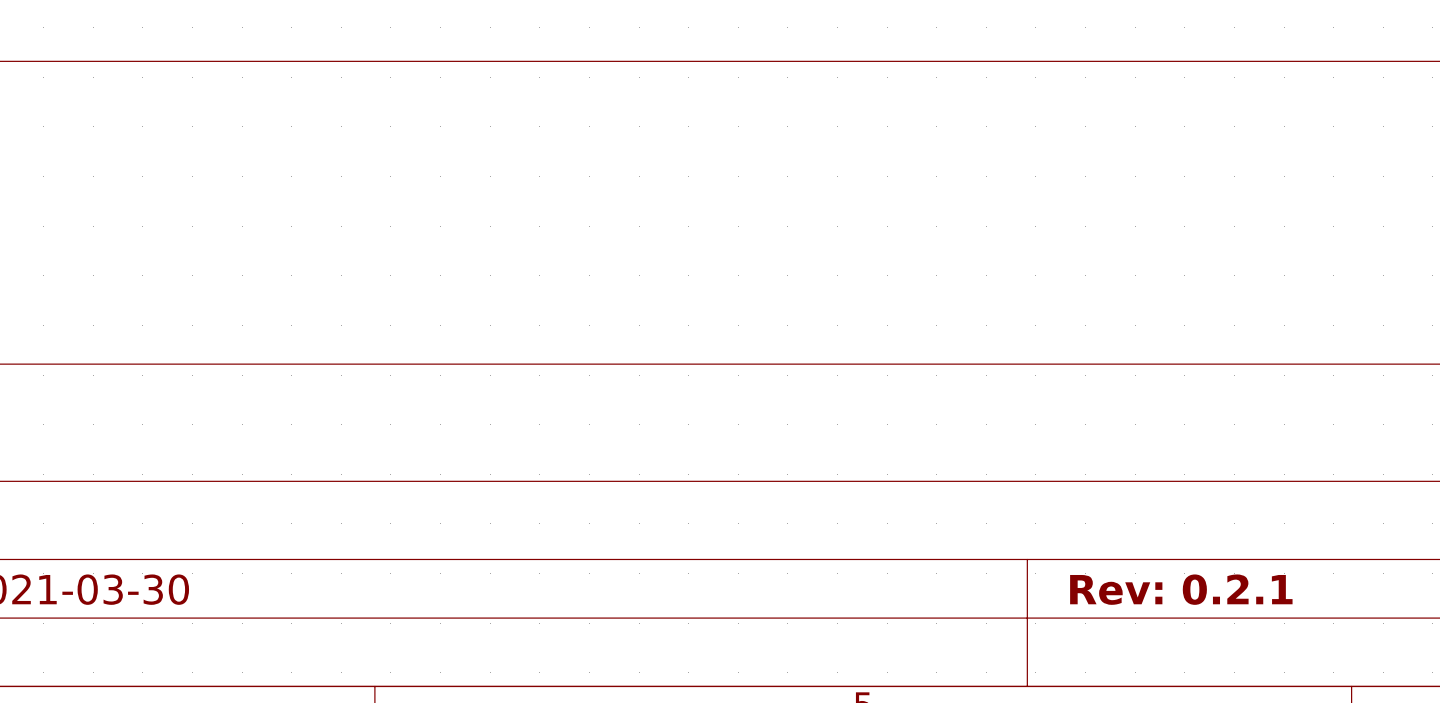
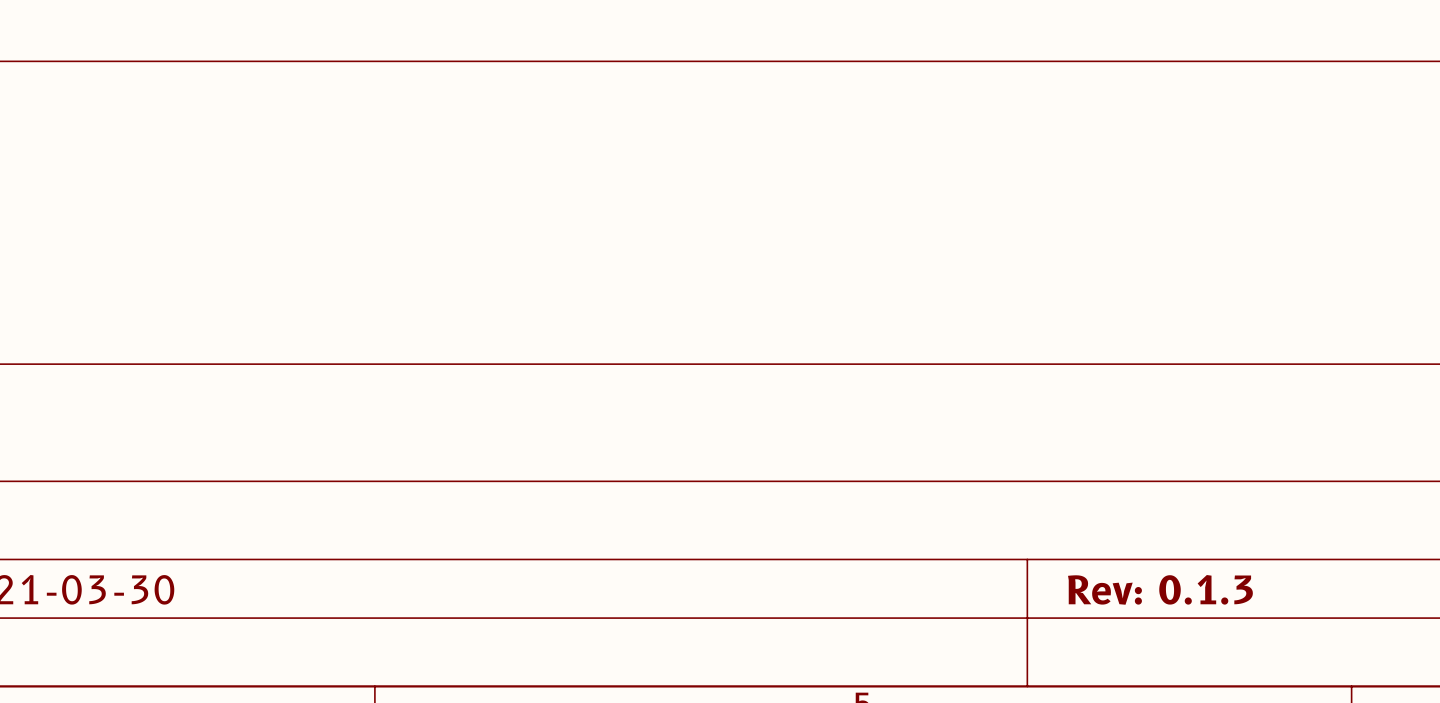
title block: Rev: 0.2.1 (1181, 589) -> Rev: 0.1.3 (1160, 589)

